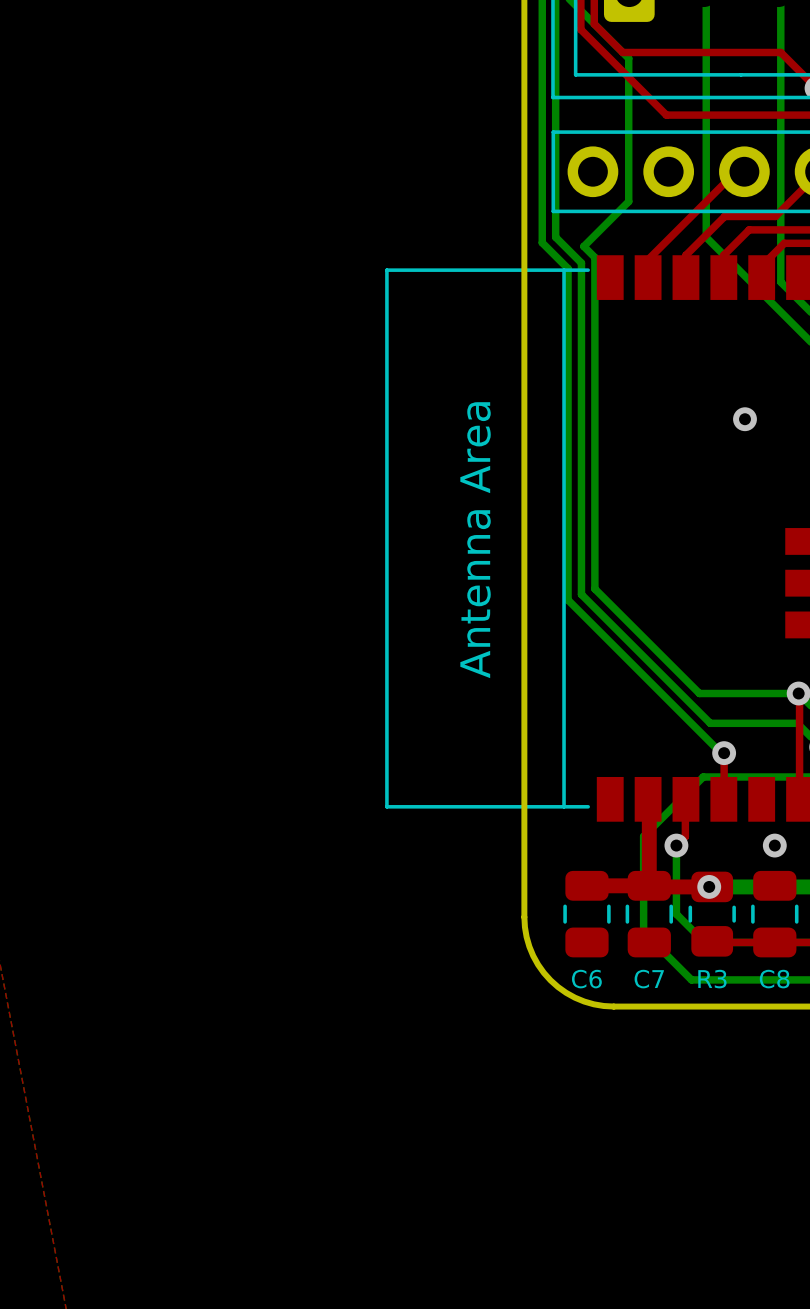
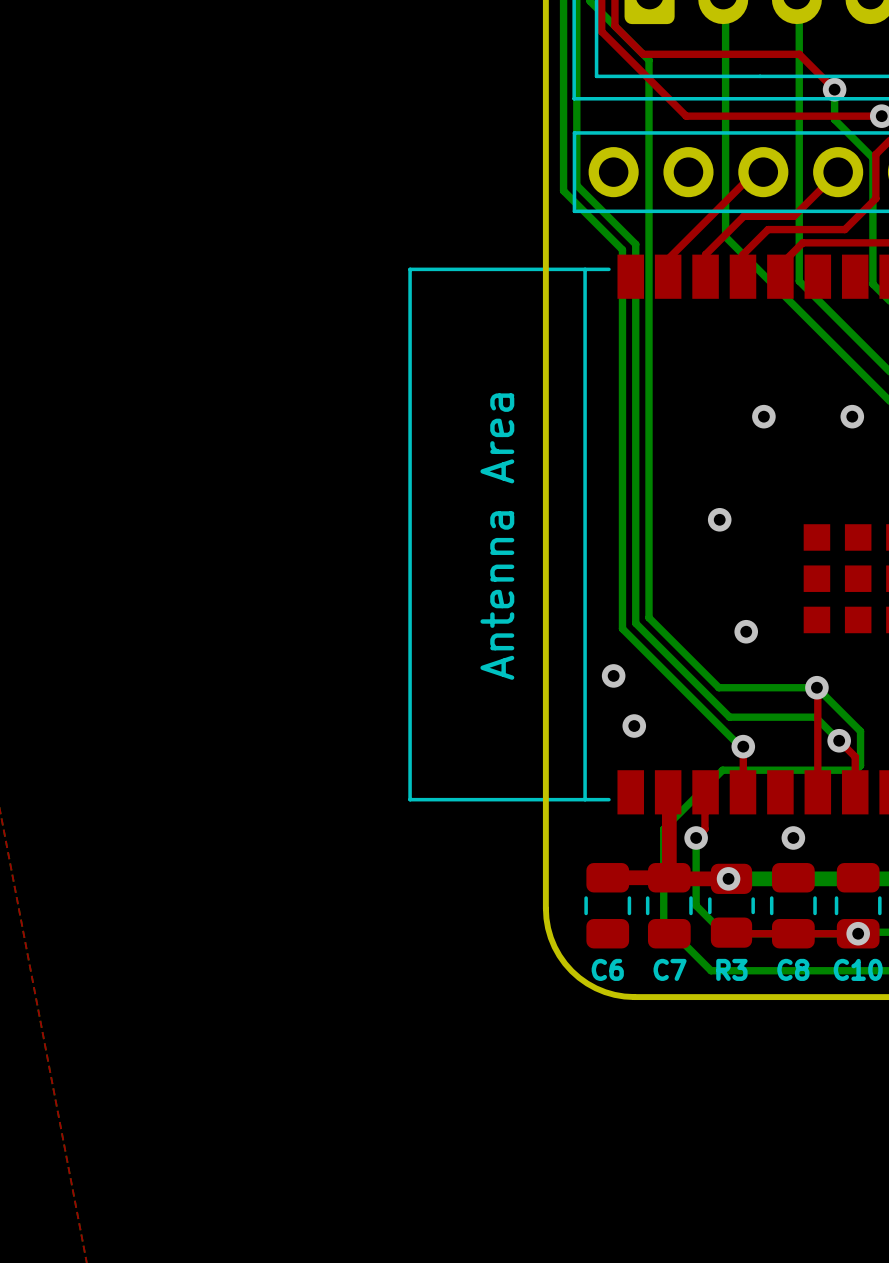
bottom track: (555, 185) (555, 237) (581, 263) (581, 594) (615, 628) -> (576, 185) (635, 244) (635, 623)
bottom track: (542, 190) (542, 242) (568, 268) (568, 600) (601, 633) -> (563, 190) (622, 249) (622, 628)
bottom track: (628, 201) (583, 246) (594, 257) (594, 588) (628, 622) -> (649, 201) (649, 617)
via: none -> (719, 519)
via: none -> (746, 631)
via: none -> (613, 675)
via: none -> (634, 726)

